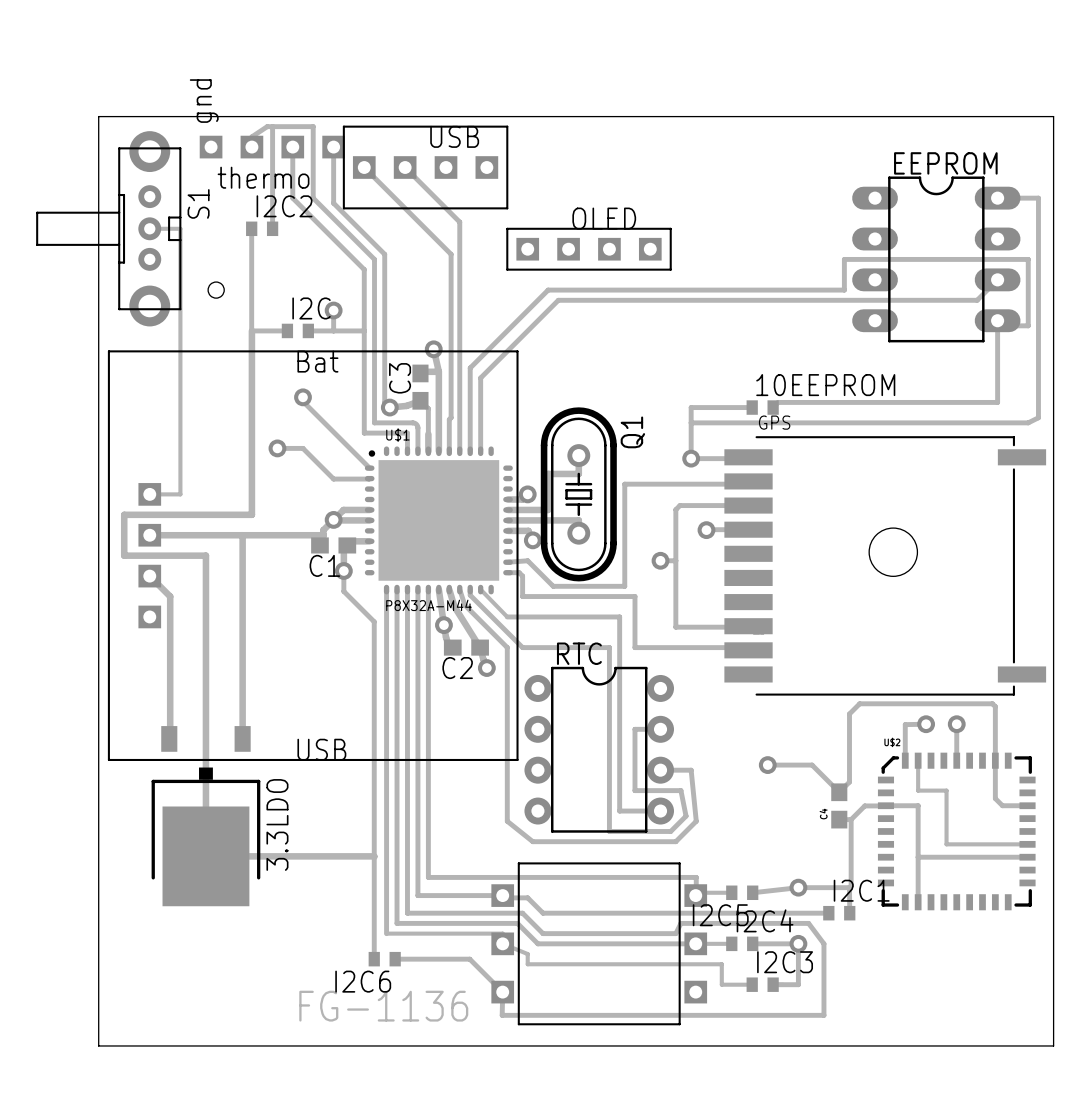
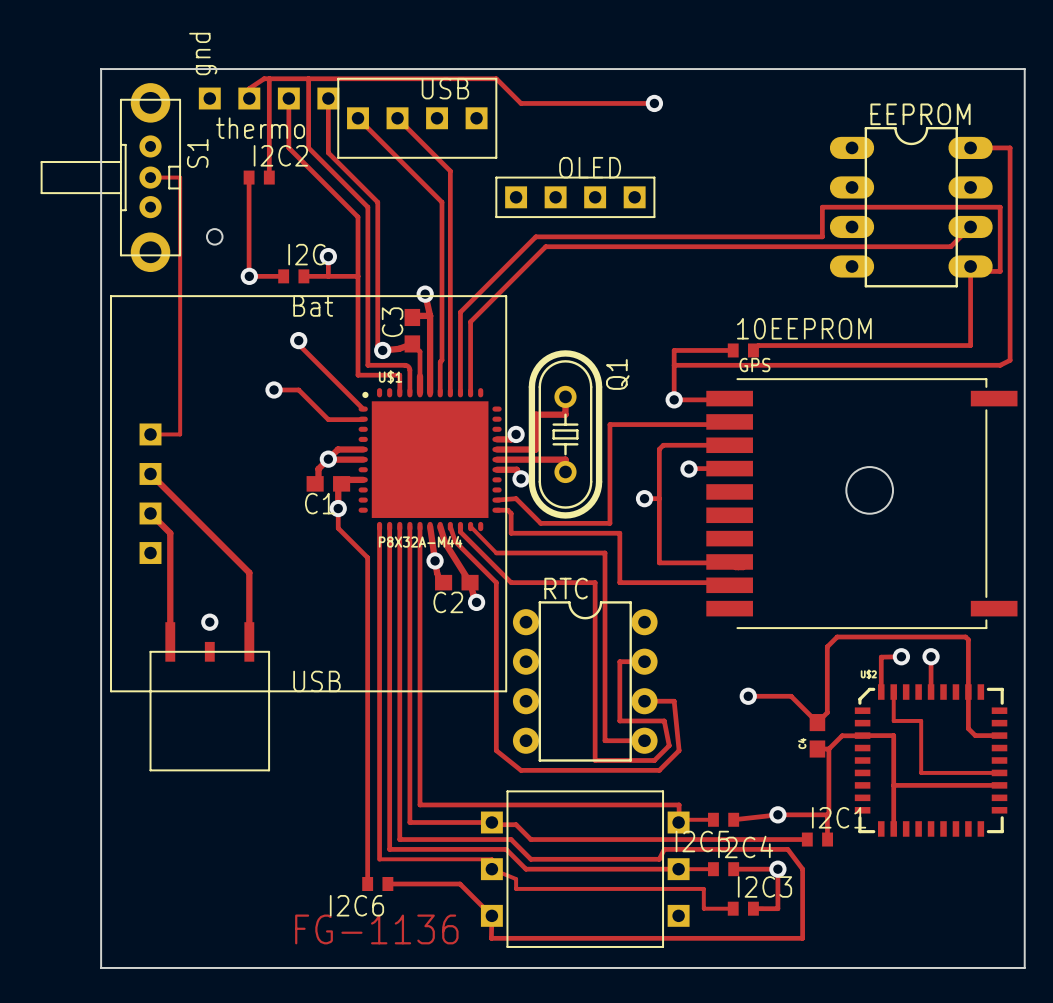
track: none -> (308, 78) (496, 78) (521, 103) (654, 103)
via: none -> (654, 103)
track: (251, 330) (251, 514) (124, 514) (124, 555) (205, 555) (205, 856) (374, 857) -> none
via: none -> (249, 276)
track: (149, 535) (323, 535) -> (150, 473) (249, 572) (249, 632)
track: (241, 535) (242, 738) -> none
via: none -> (209, 622)
track: (170, 698) (169, 738) -> none
part: none -> (209, 696)
3.3LDO: (205, 816) -> none

